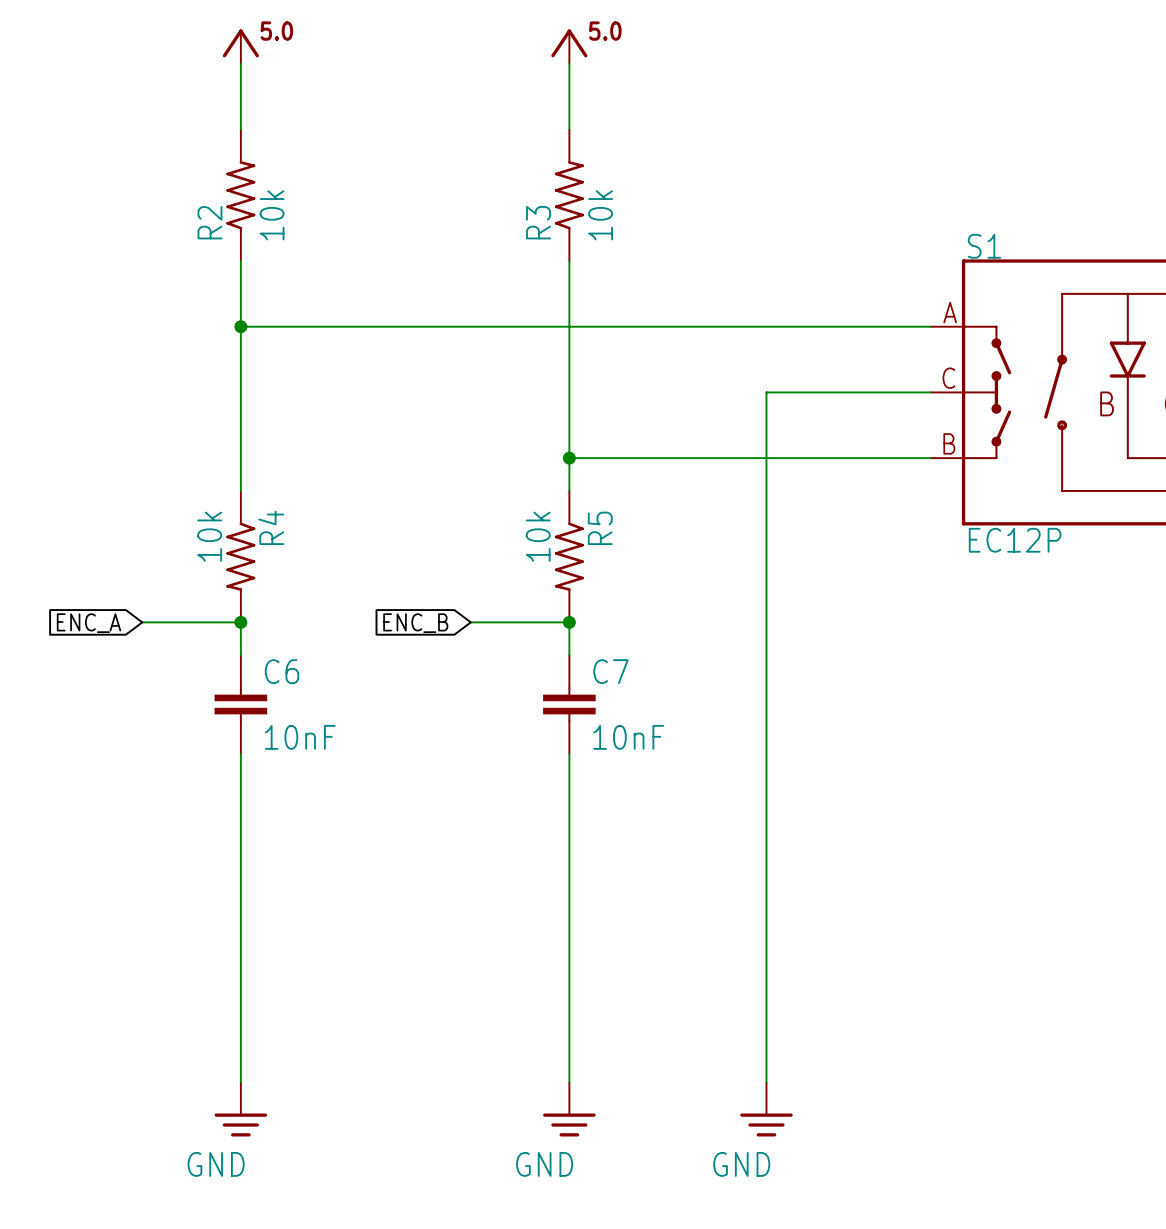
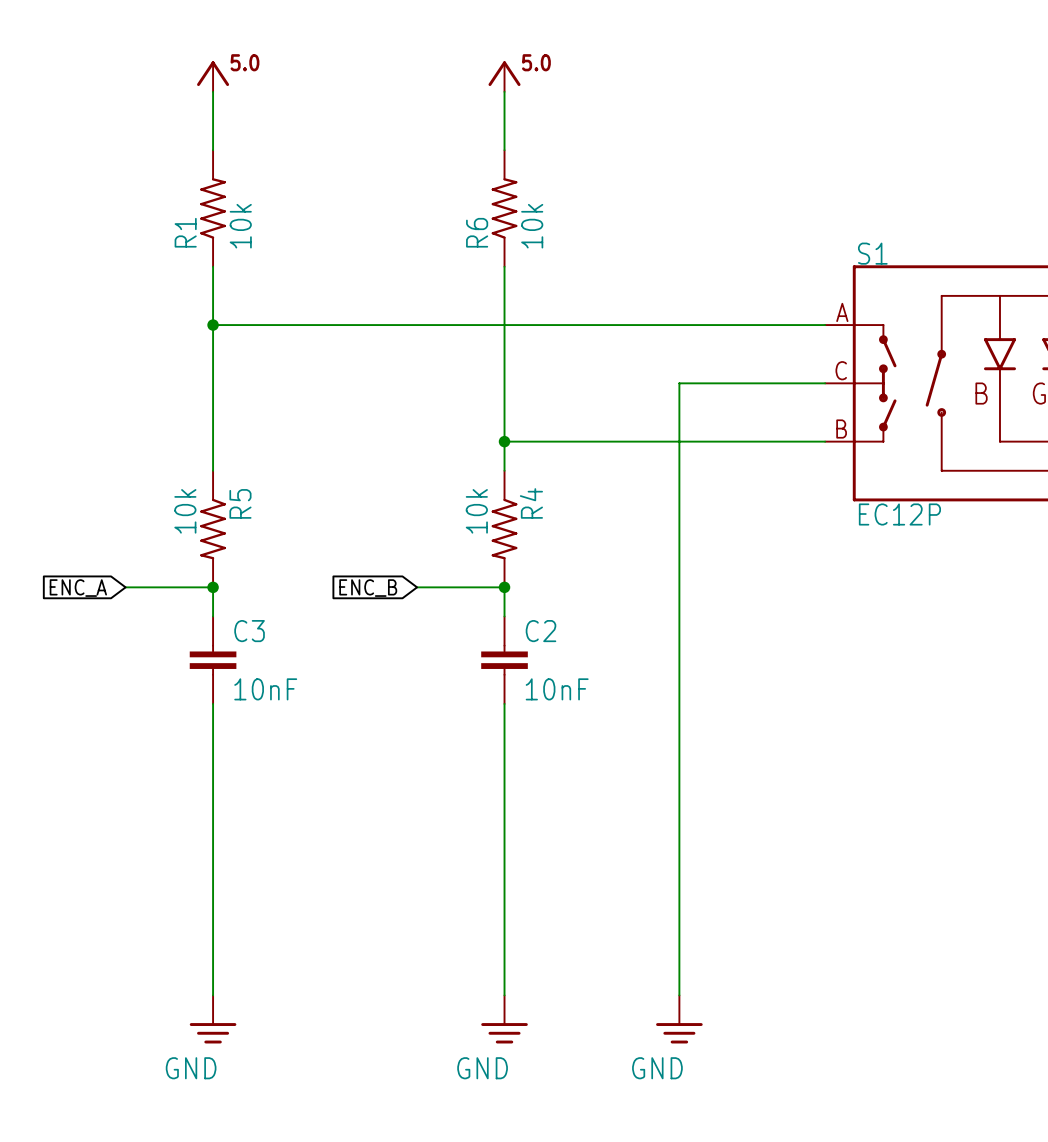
R2 name: R2 (209, 222) -> R1 (185, 232)
R3 name: R3 (538, 222) -> R6 (477, 232)
R4 name: R4 (271, 527) -> R5 (240, 503)
R5 name: R5 (600, 528) -> R4 (531, 503)
C6 name: C6 (281, 671) -> C3 (249, 631)
C7 name: C7 (610, 671) -> C2 (541, 631)

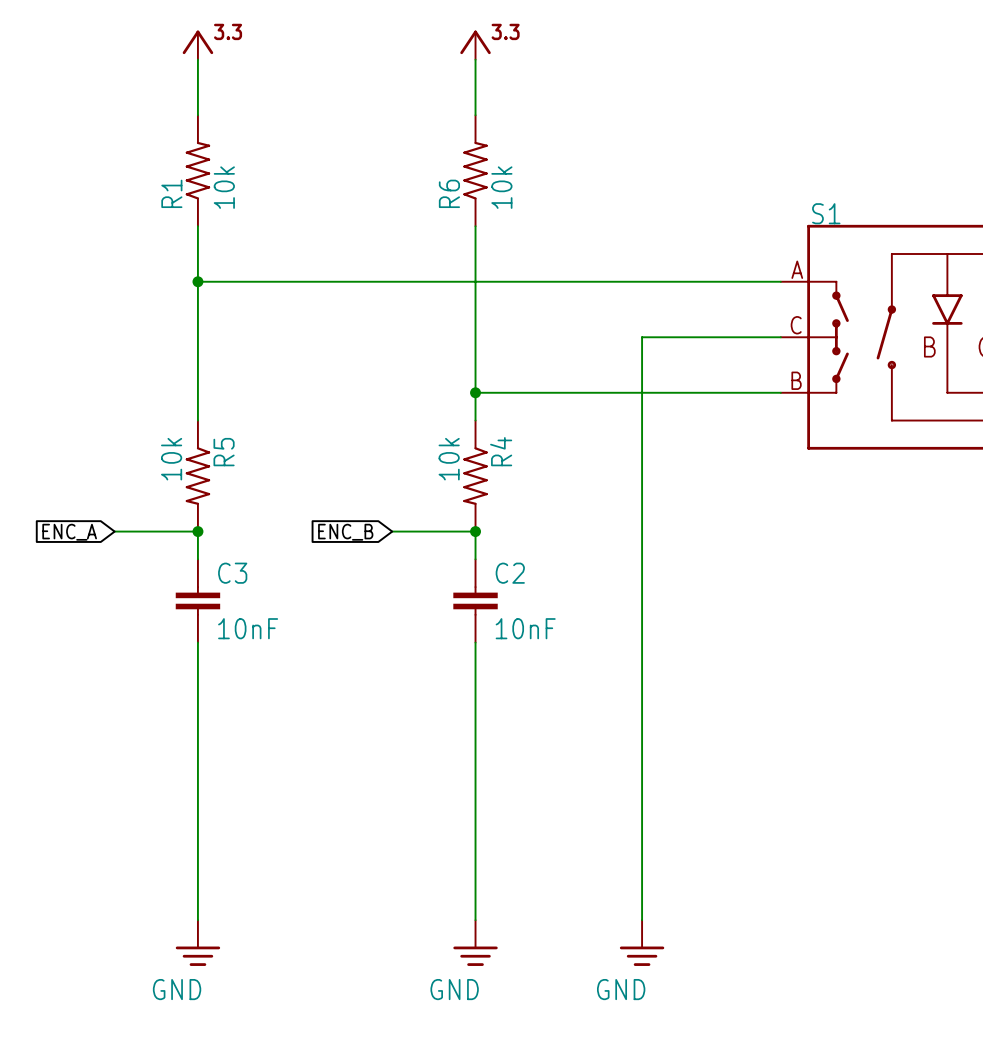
power symbol text: 5.0 (244, 62) -> 3.3 (228, 31)
power symbol text: 5.0 (536, 62) -> 3.3 (505, 31)
S1 value: EC12P (899, 514) -> none

